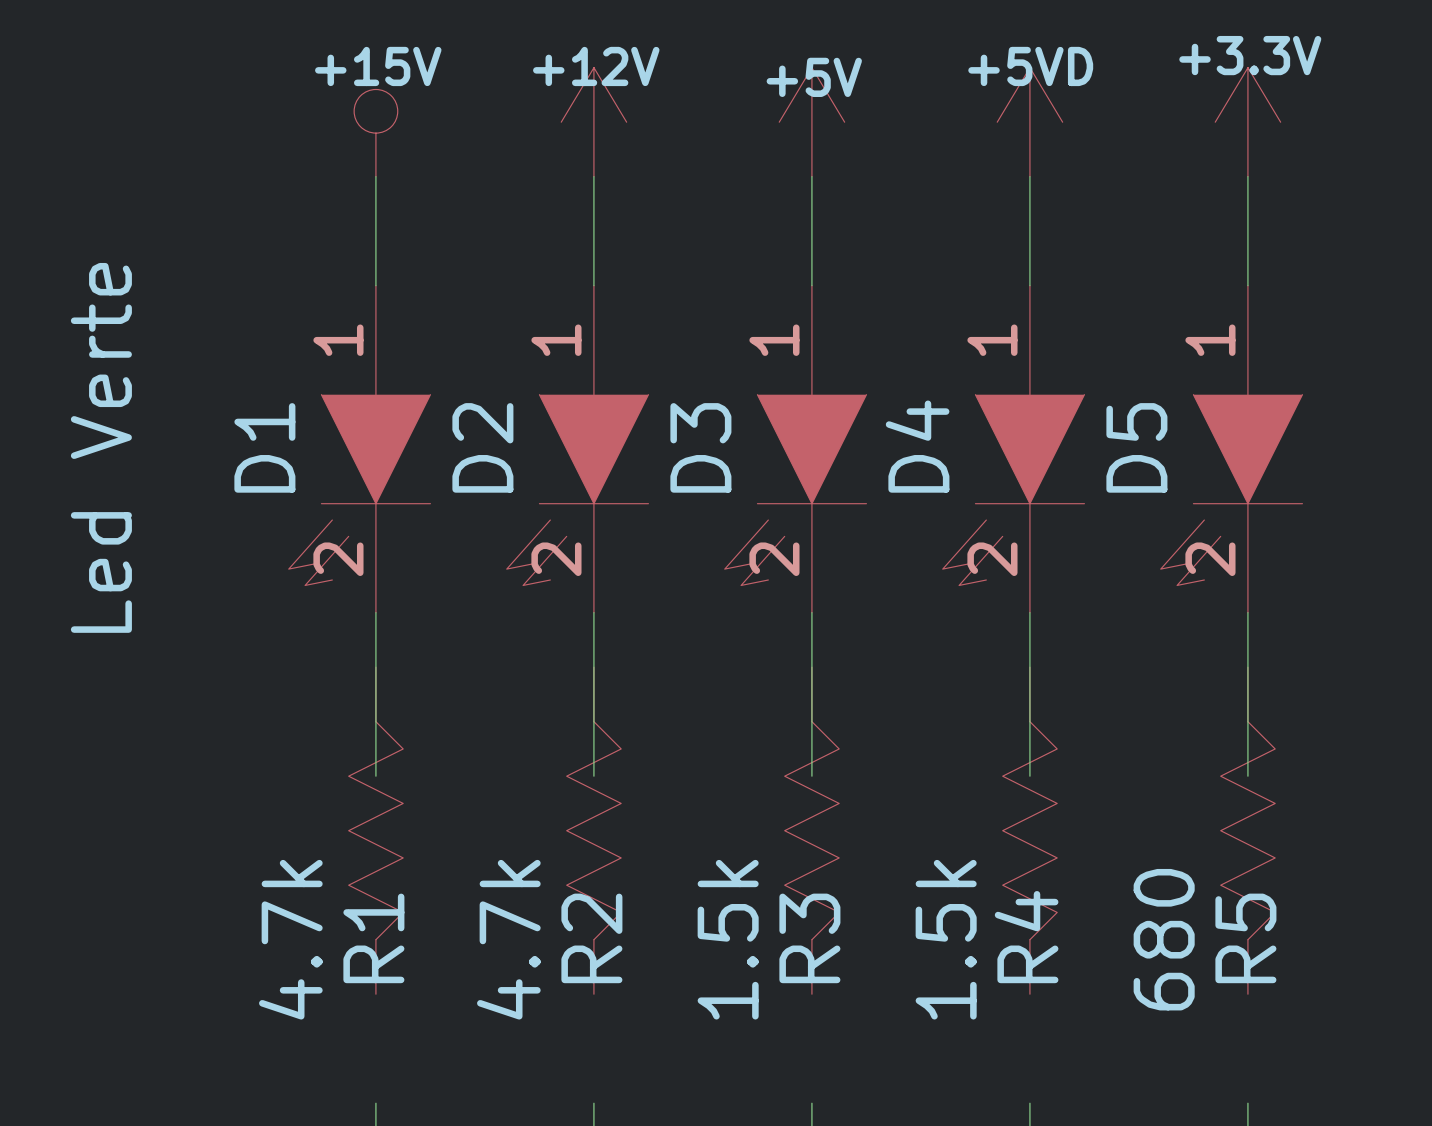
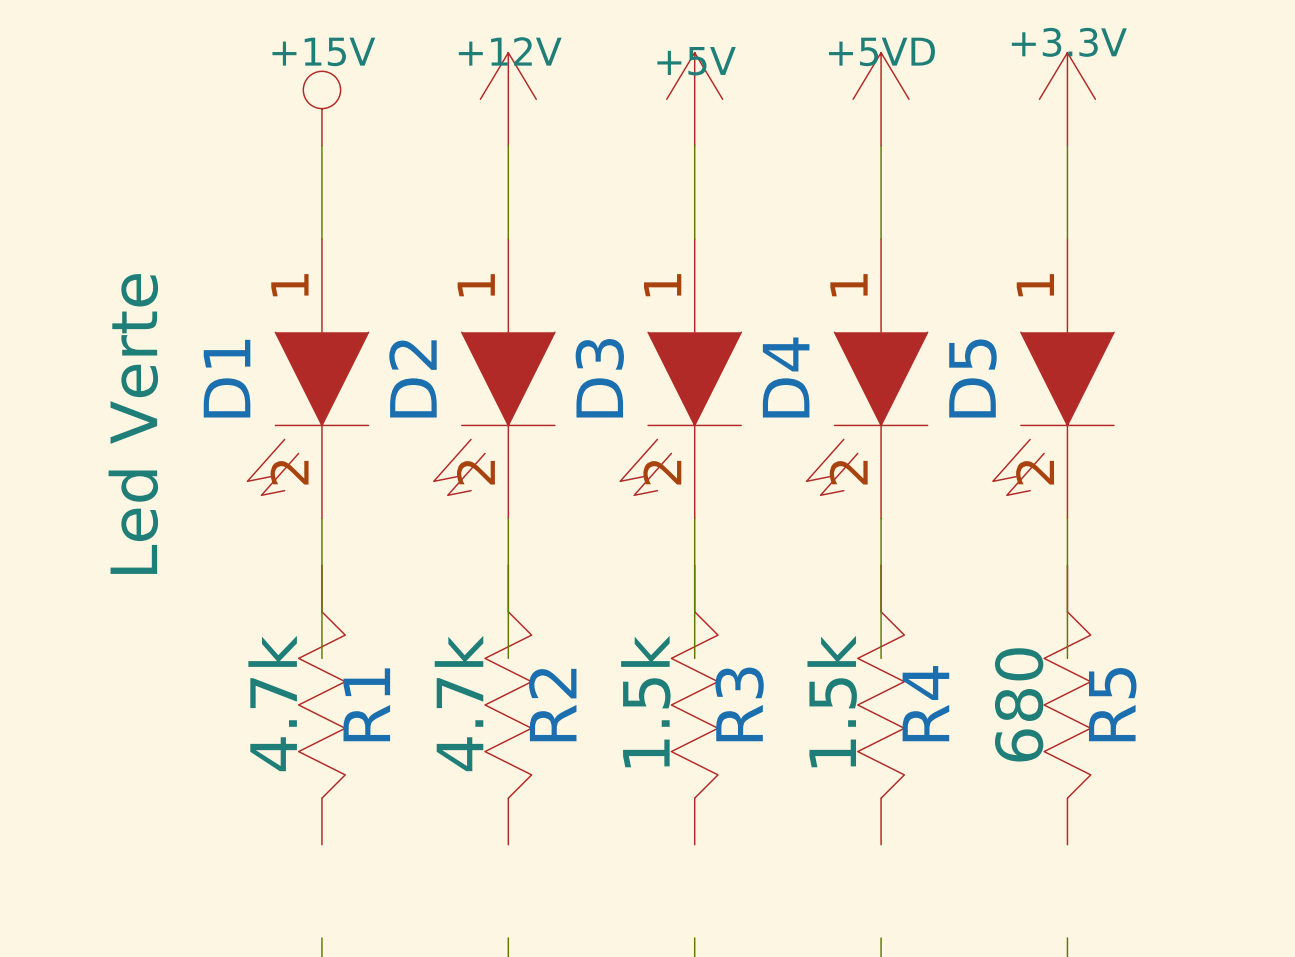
D1 value position: Led Verte (101, 447) -> Led Verte (133, 424)
R4 name position: R4 (1026, 937) -> R4 (925, 703)
R1 name position: R1 (373, 938) -> R1 (366, 704)
R2 name position: R2 (591, 938) -> R2 (552, 705)
R3 name position: R3 (809, 938) -> R3 (739, 704)
R5 name position: R5 (1245, 938) -> R5 (1112, 704)
R1 value position: 4.7k (290, 939) -> 4.7k (272, 703)
R2 value position: 4.7k (508, 939) -> 4.7k (459, 703)
R3 value position: 1.5k (728, 939) -> 1.5k (645, 701)
R4 value position: 1.5k (946, 939) -> 1.5k (832, 701)
R5 value position: 680 (1164, 939) -> 680 (1019, 704)

